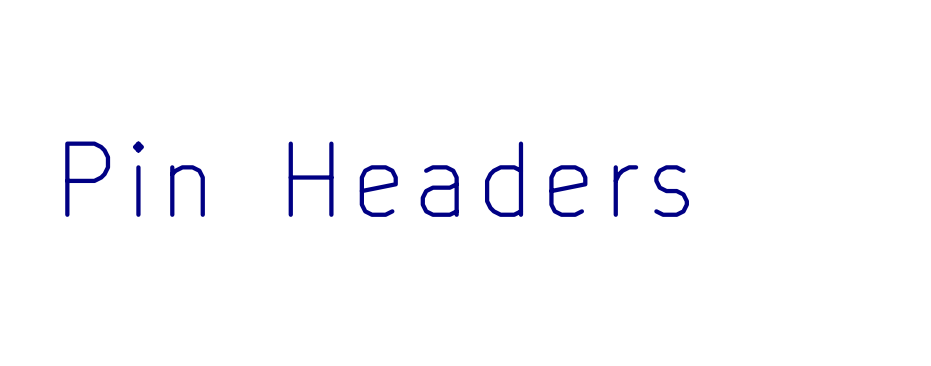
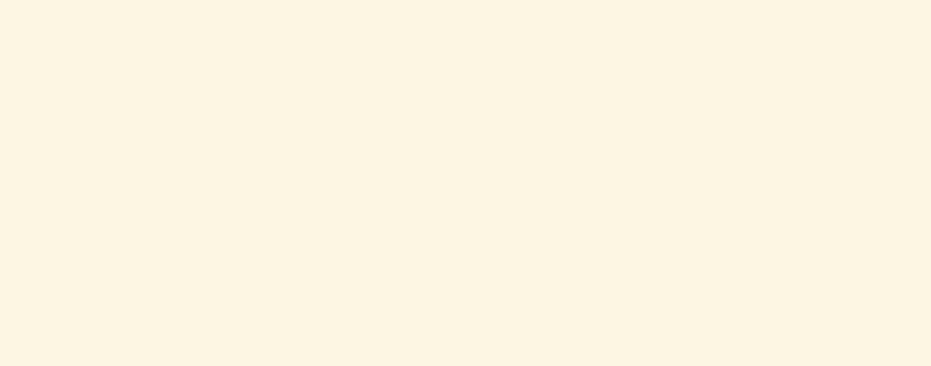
text: Pin Headers (377, 179) -> none

